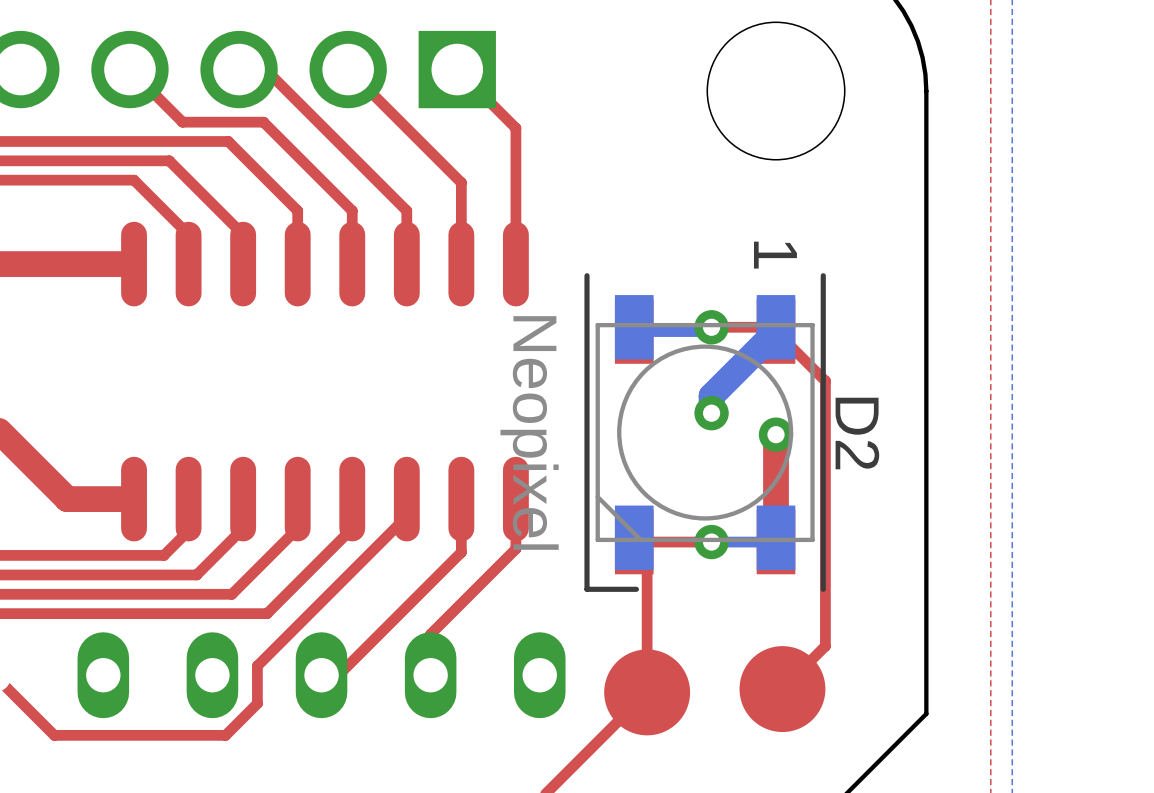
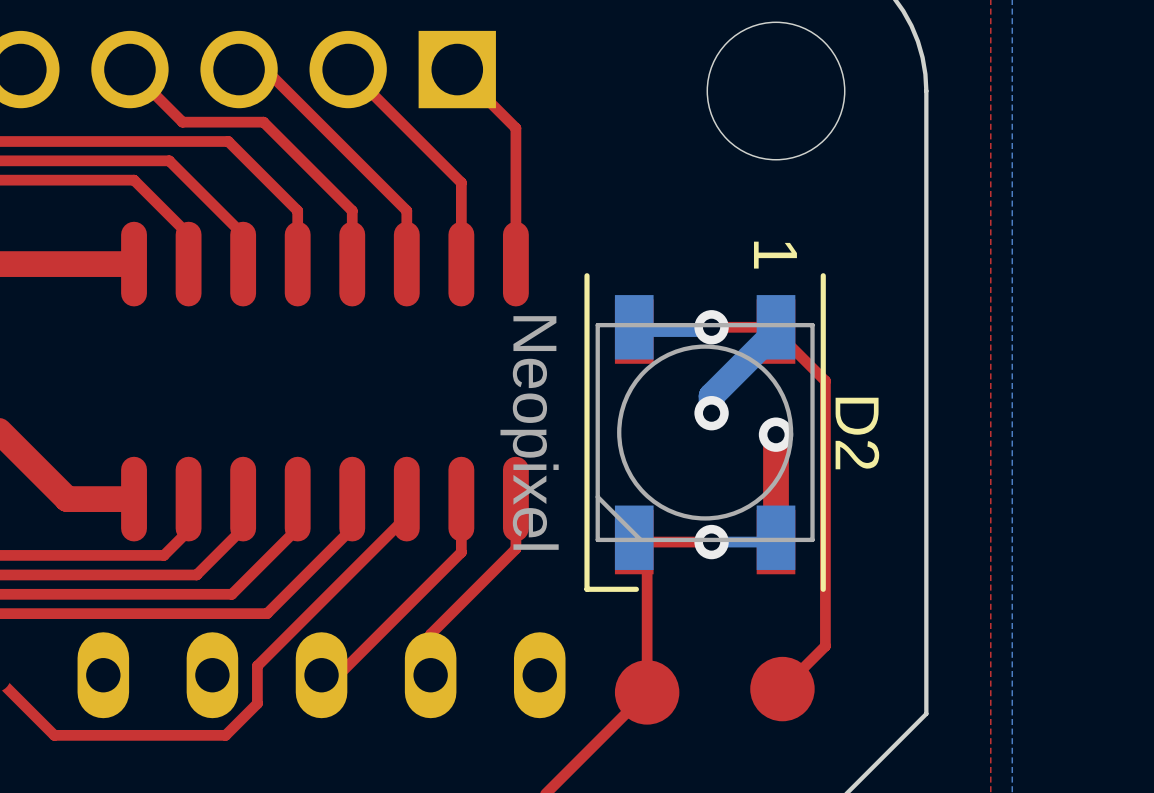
part footprint: [739, 646, 826, 733] -> [750, 656, 815, 722]
part footprint: [604, 649, 691, 736] -> [614, 660, 680, 725]

